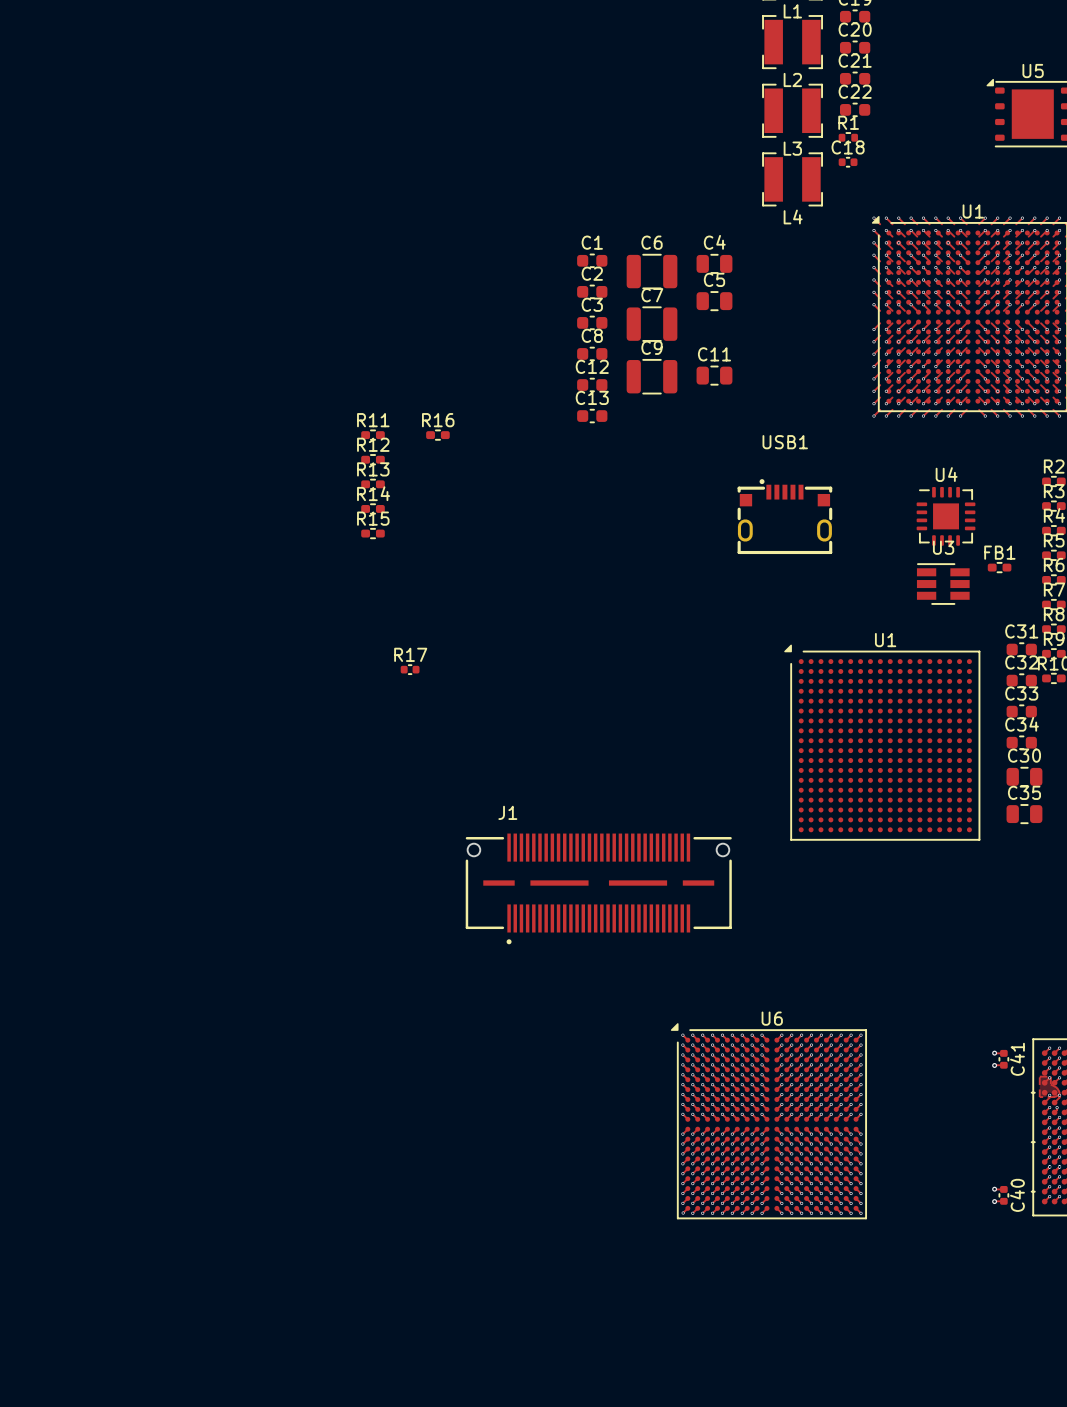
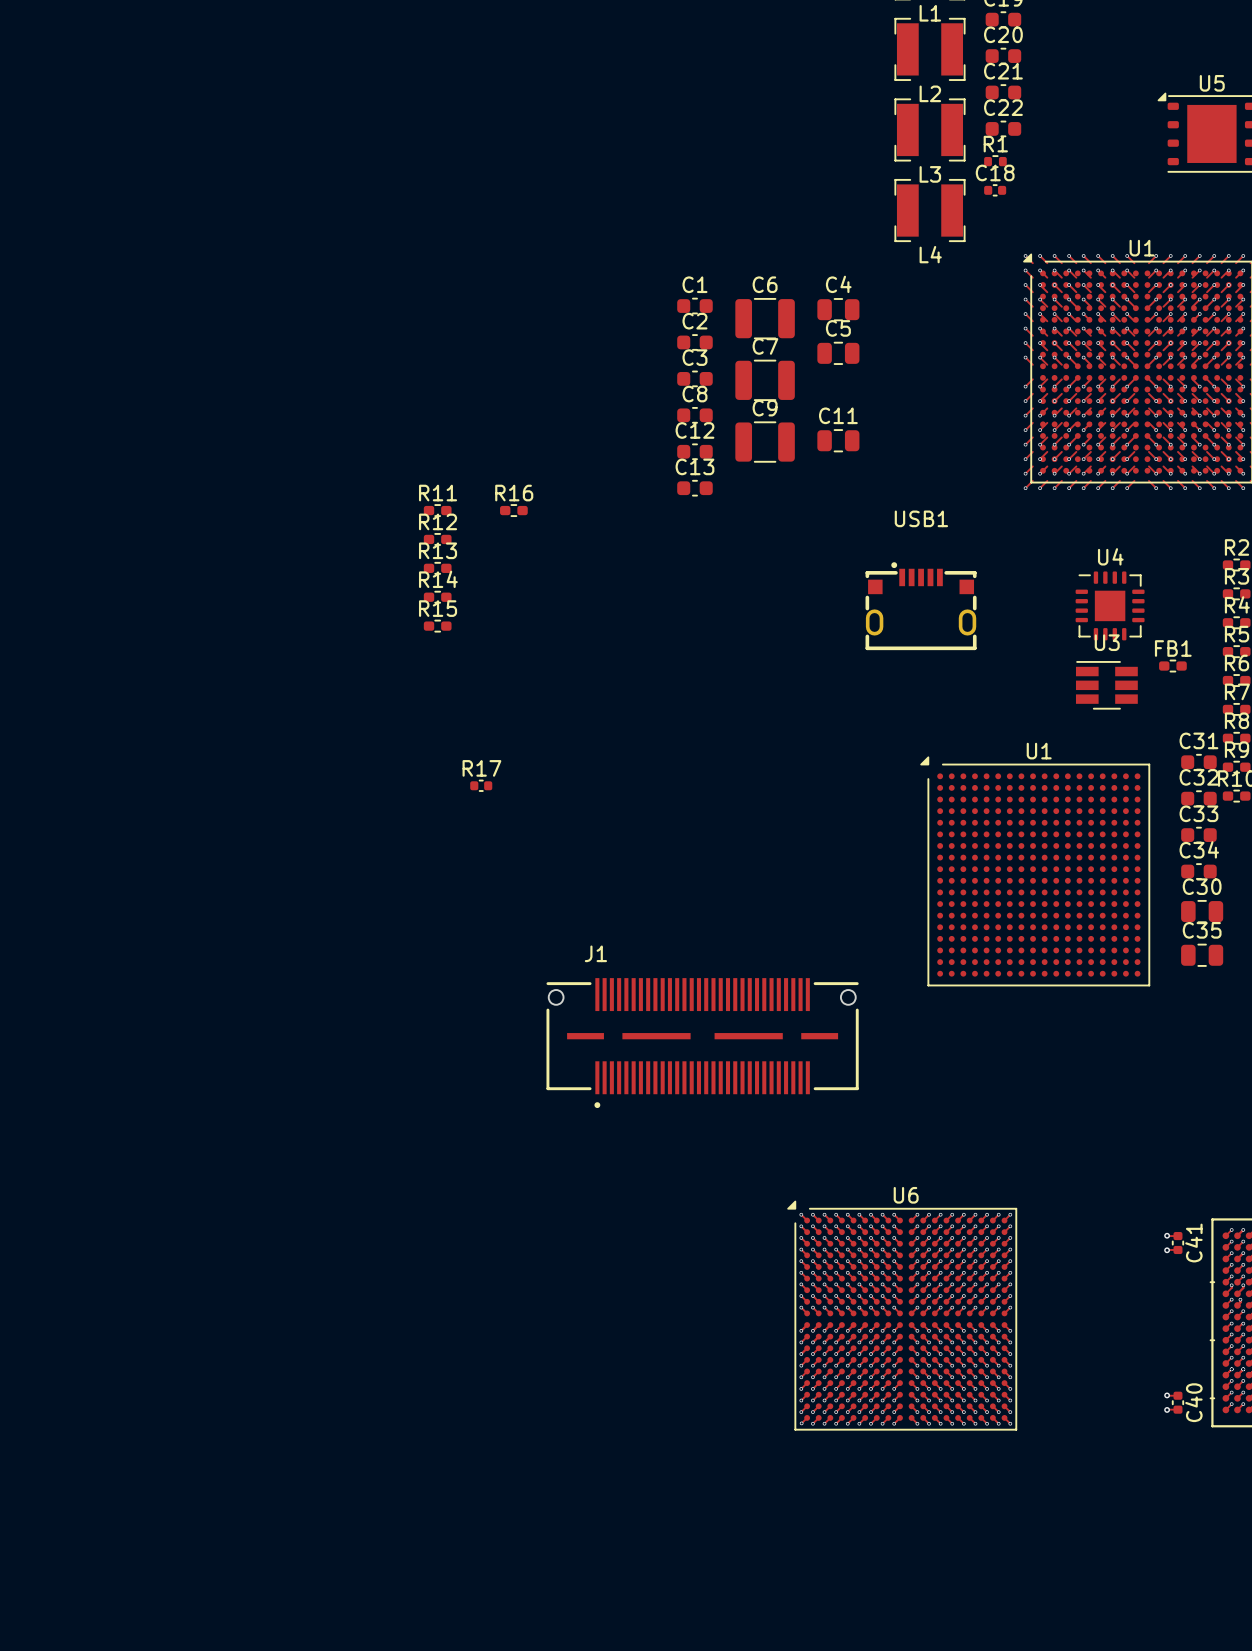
zone outline: (1039, 1076) (1039, 1097) (1055, 1097) (1059, 1094) (1057, 1087) (1050, 1084) (1050, 1076) (1039, 1076) -> none
track: none -> (1231, 1276) (1225, 1282)
via: none -> (1231, 1276)
track: none -> (1243, 1276) (1237, 1282)
via: none -> (1243, 1276)

